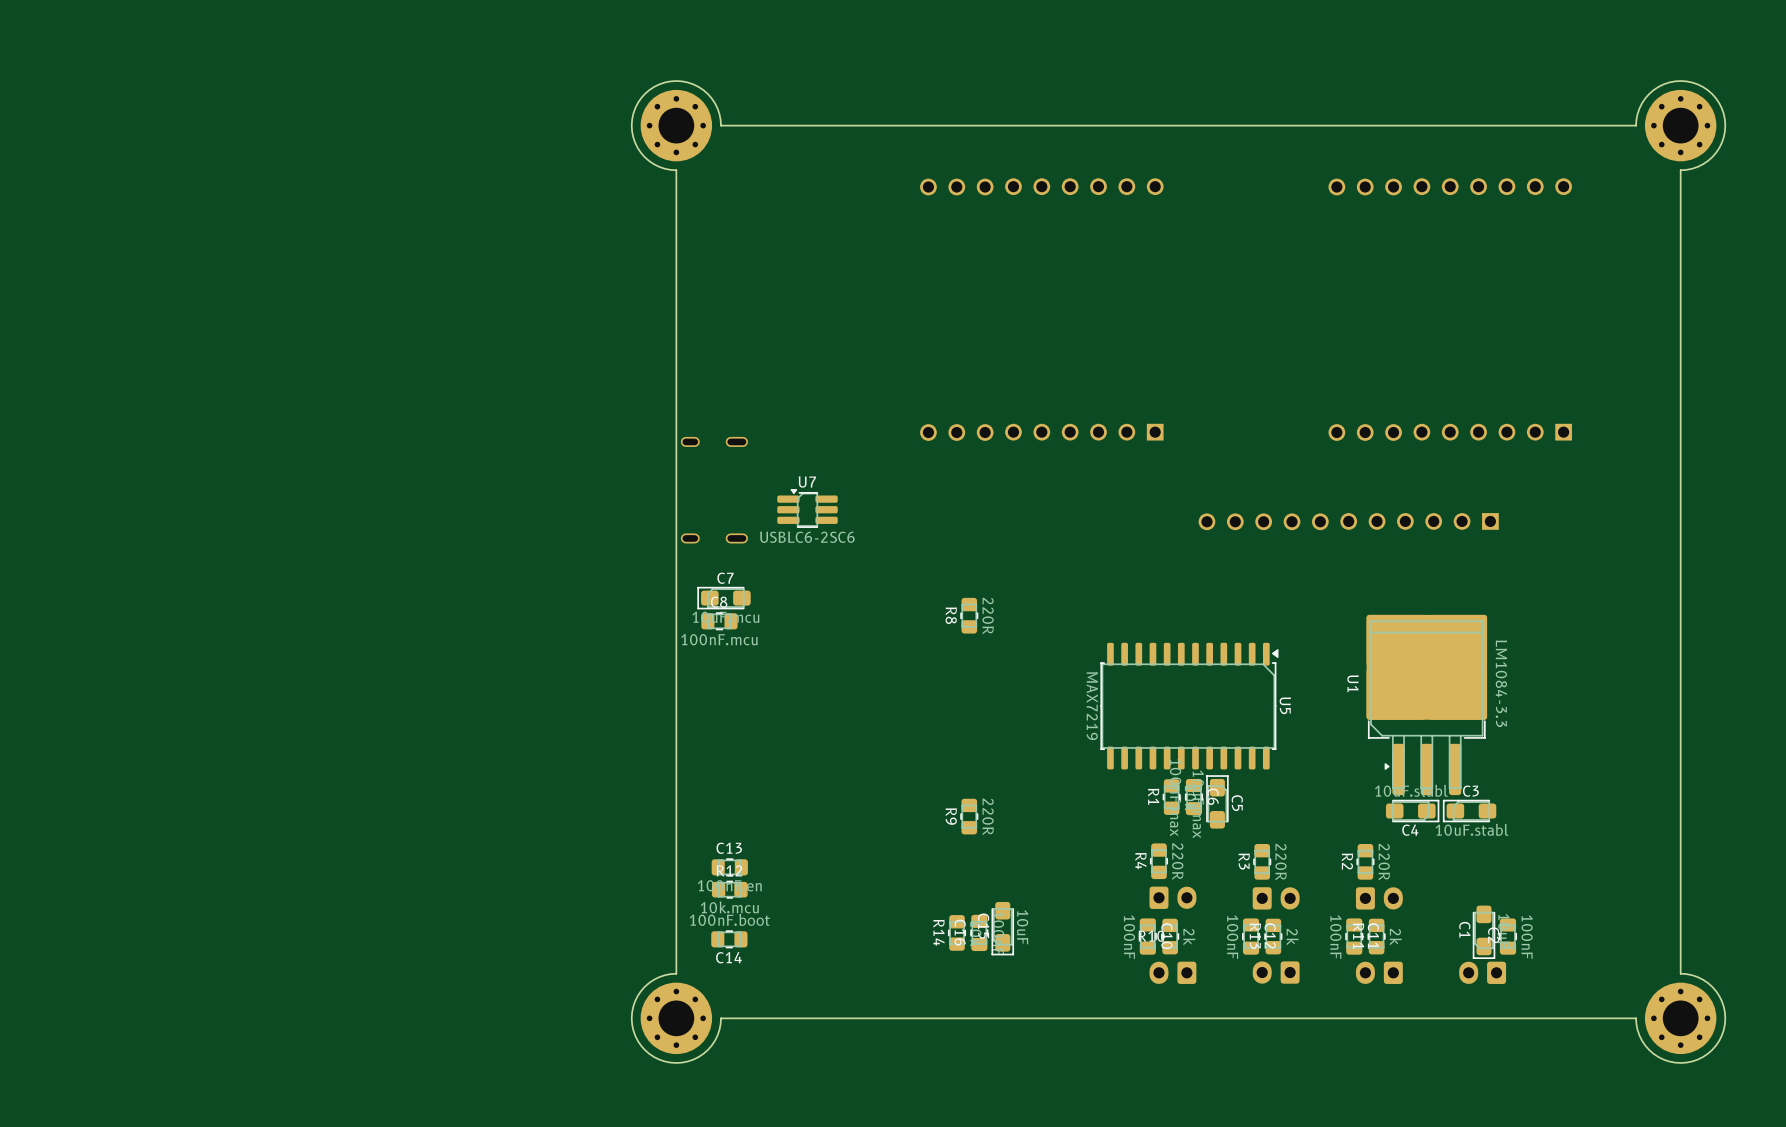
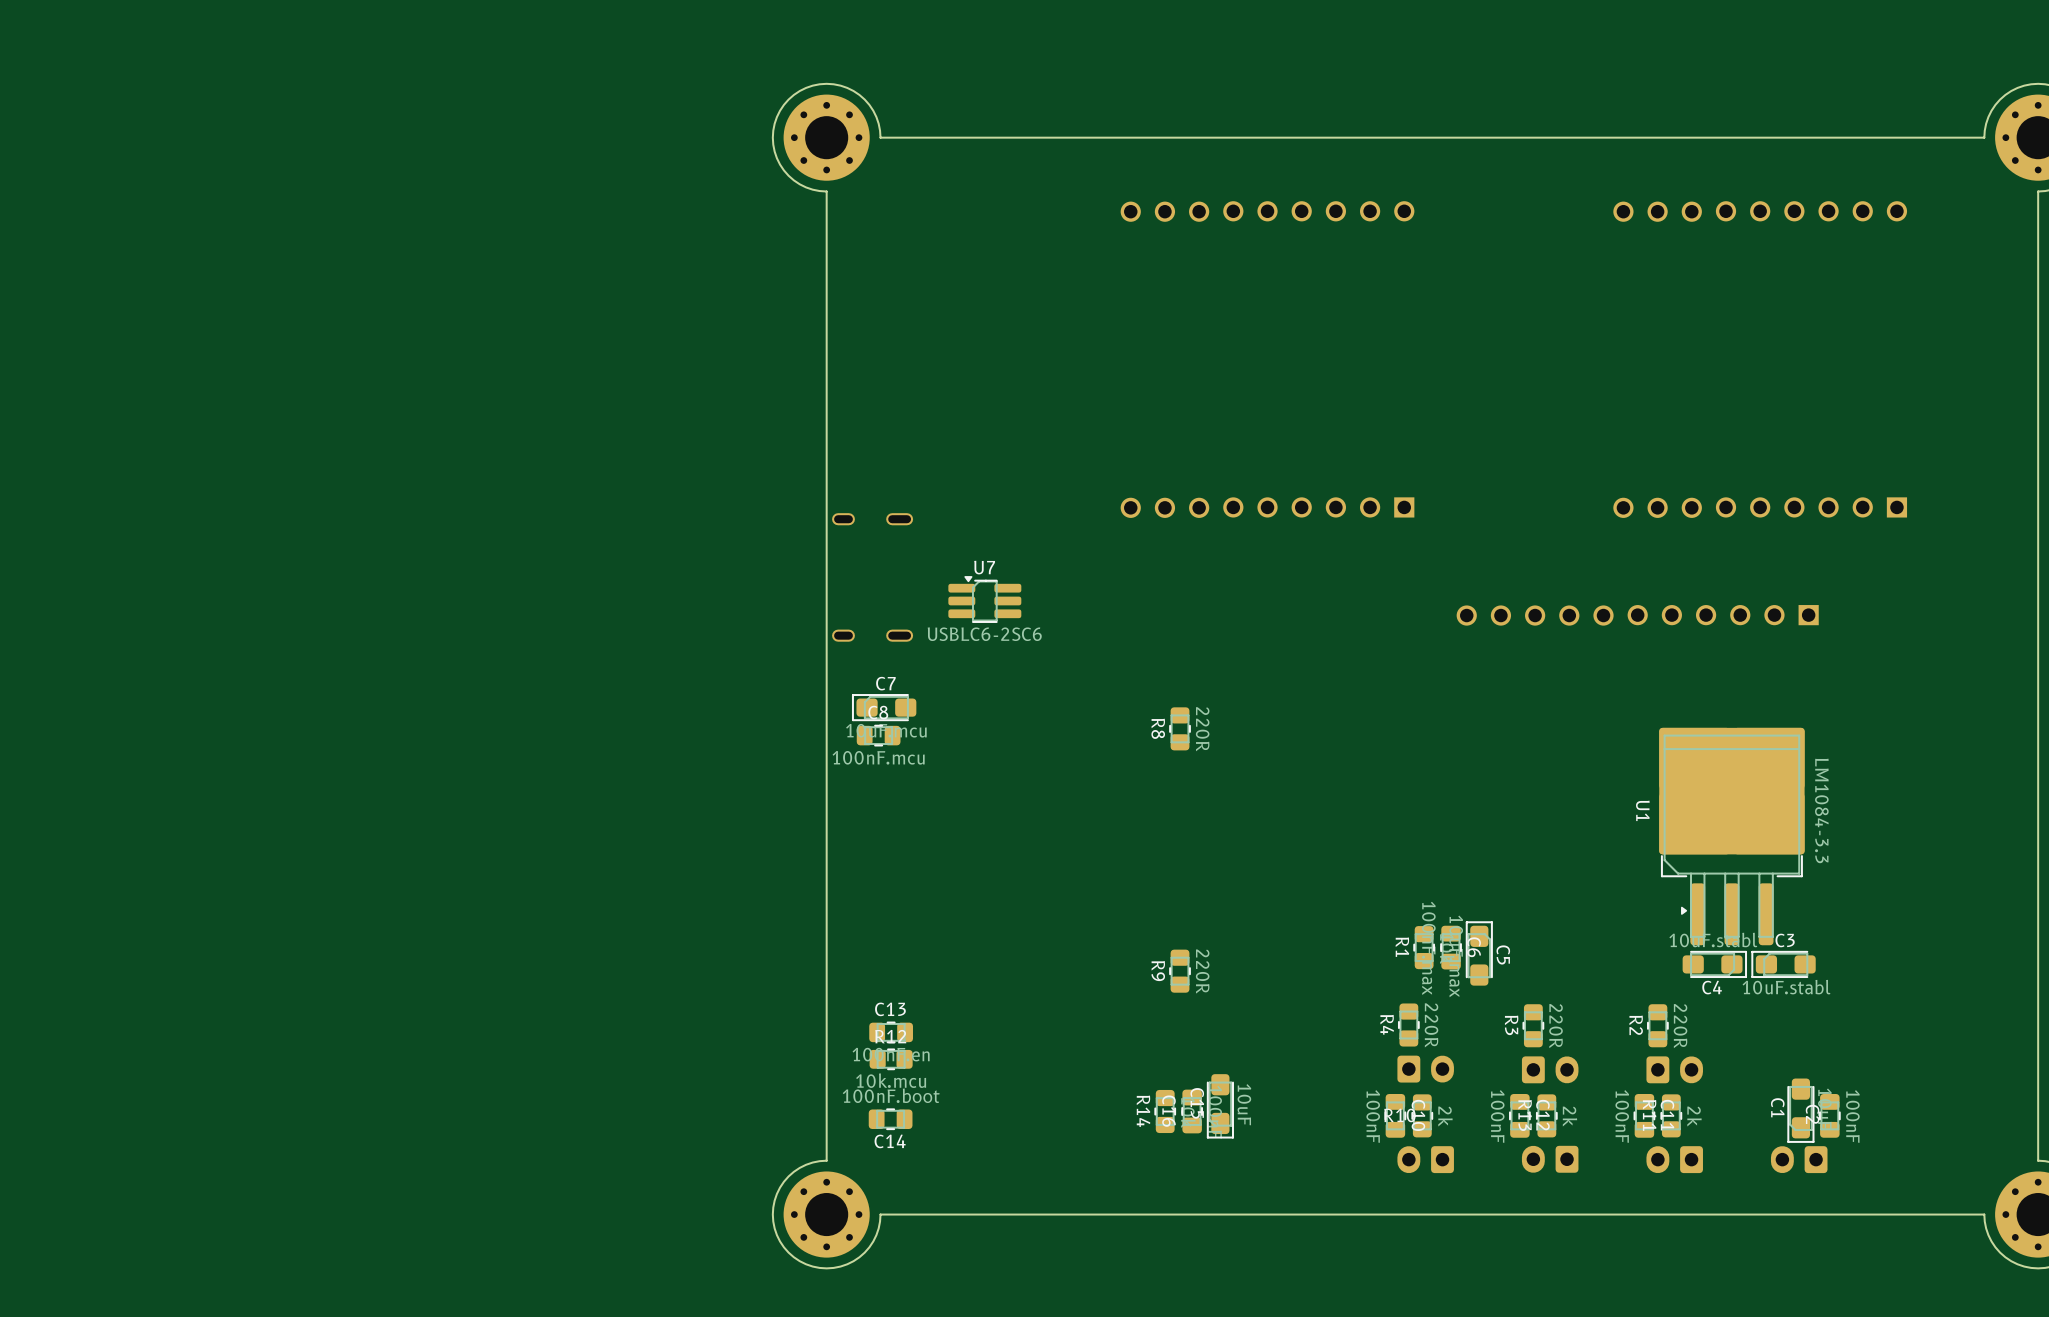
U5: MAX7219 (1189, 706) -> none

